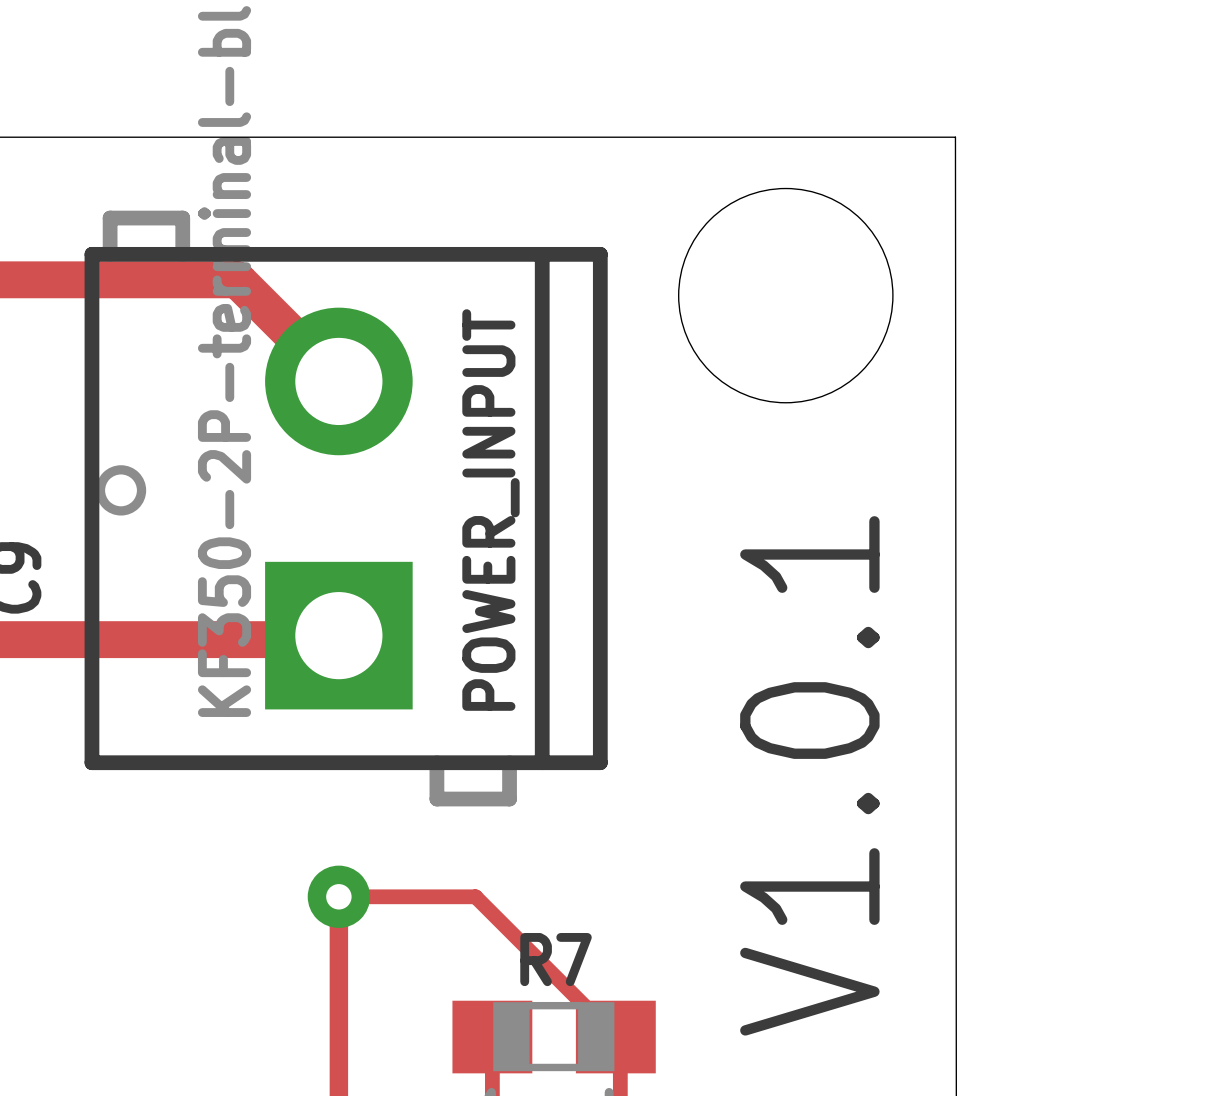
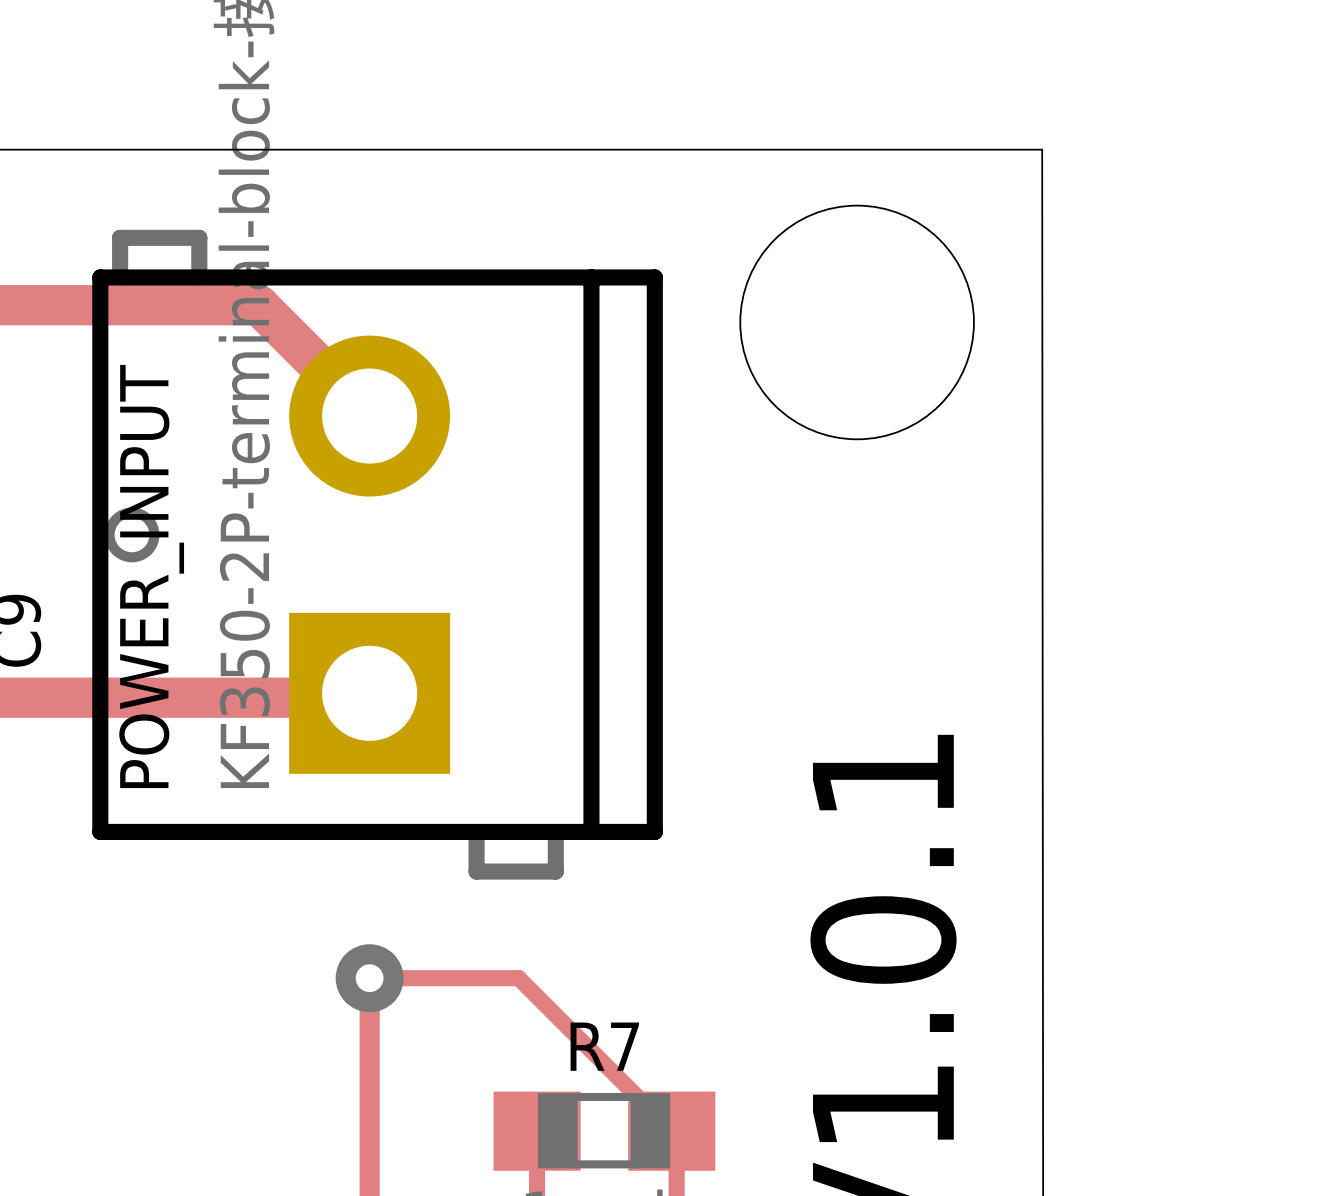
POWER_INPUT name position: POWER_INPUT (490, 510) -> POWER_INPUT (151, 576)

